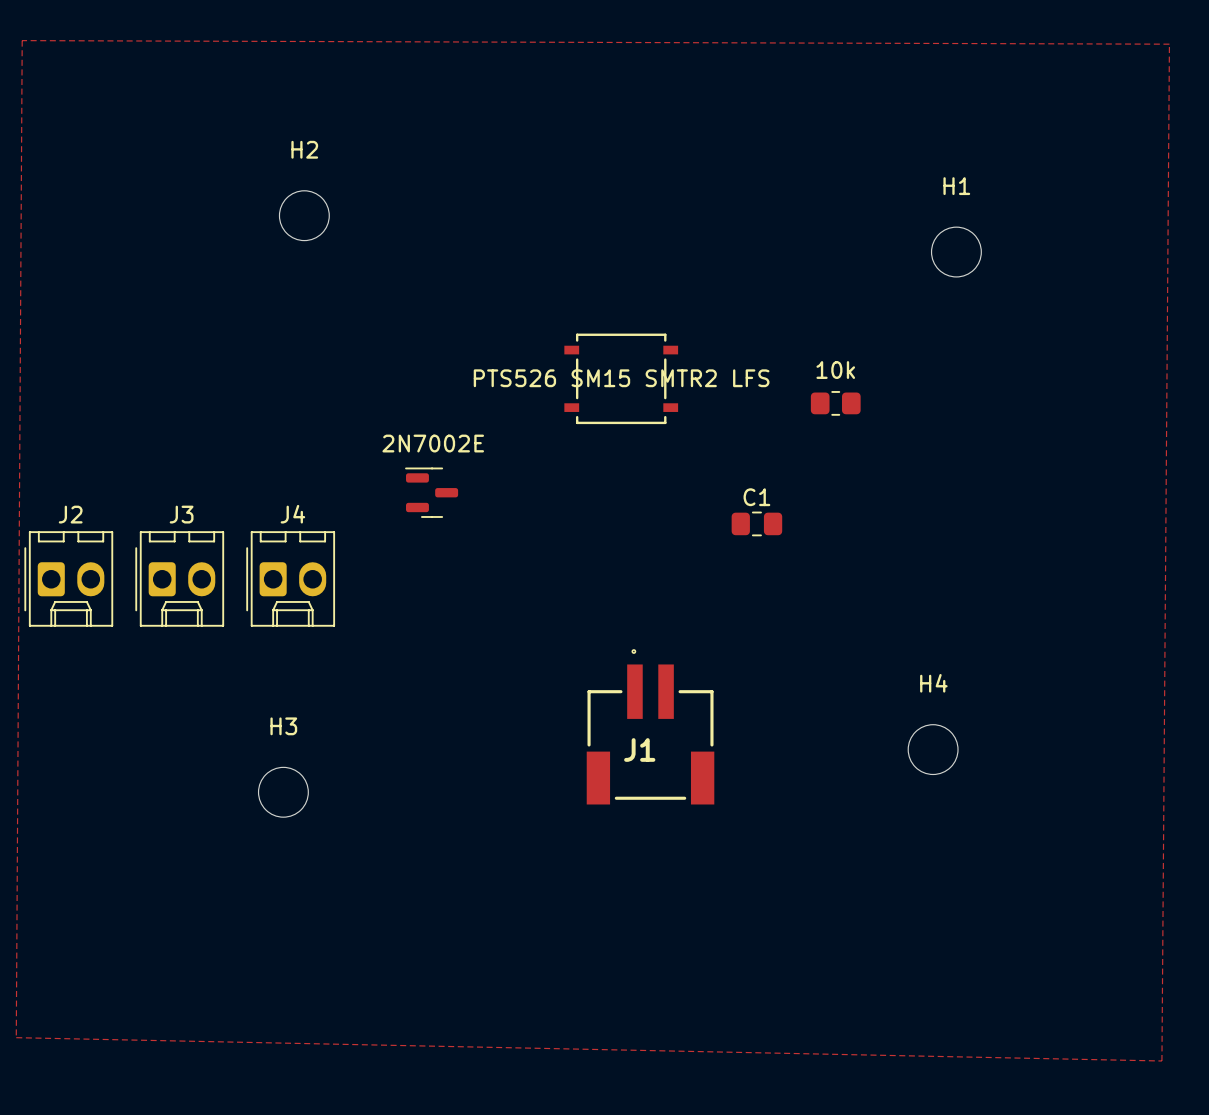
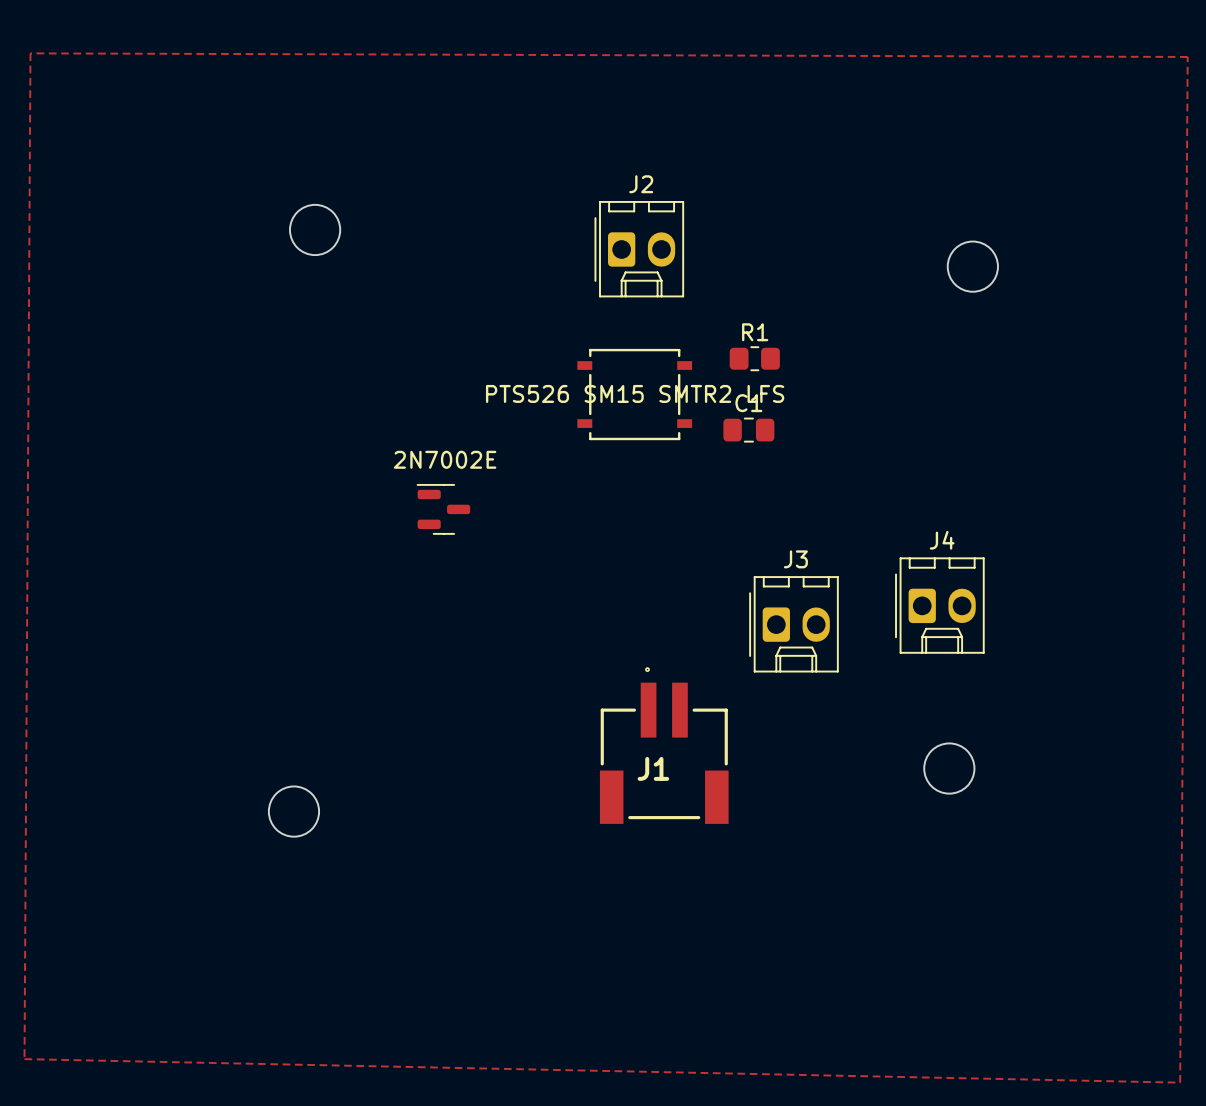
H2 name: H2 (304, 149) -> none
H1 name: H1 (956, 186) -> none
R1: none -> (754, 358)
part: 10k (835, 403) -> none
C1 position: (756, 523) -> (748, 430)
J2 position: (68, 578) -> (639, 249)
J3 position: (179, 578) -> (793, 624)
J4 position: (290, 578) -> (939, 605)
H4 name: H4 (933, 683) -> none
H3 name: H3 (283, 726) -> none

